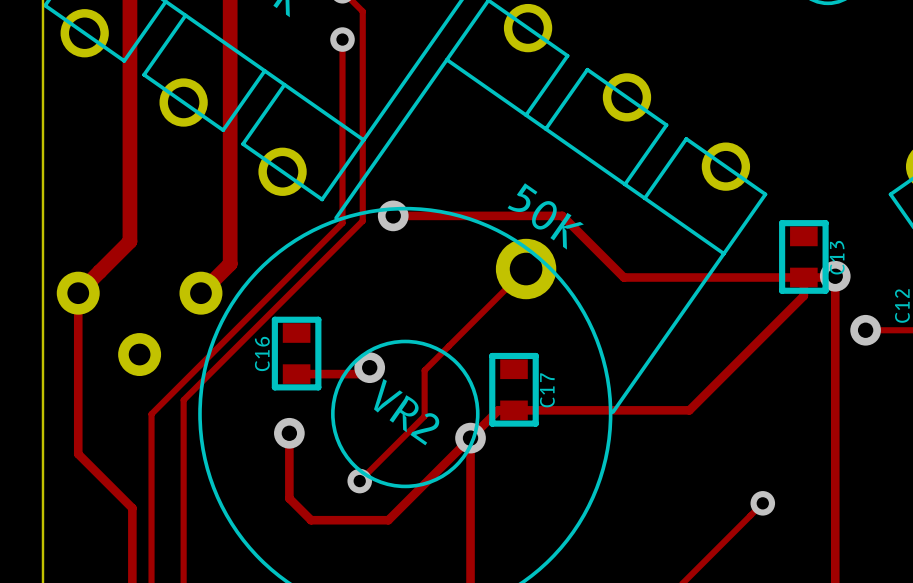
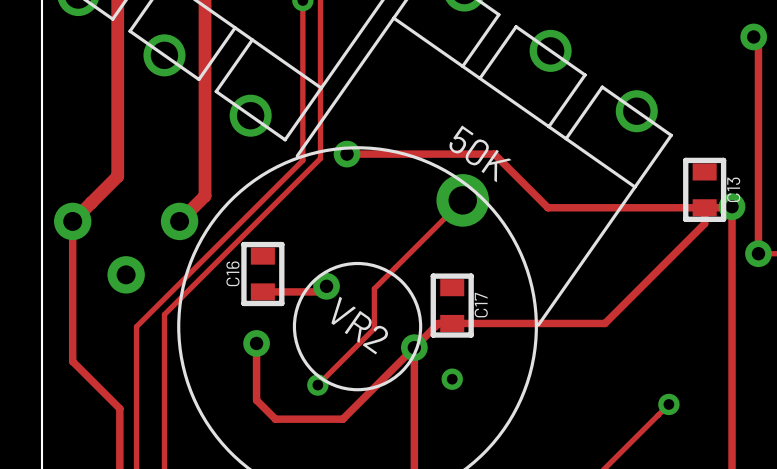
track: none -> (753, 36) (758, 41) (758, 253)
via: none -> (753, 36)
via: none -> (452, 379)

